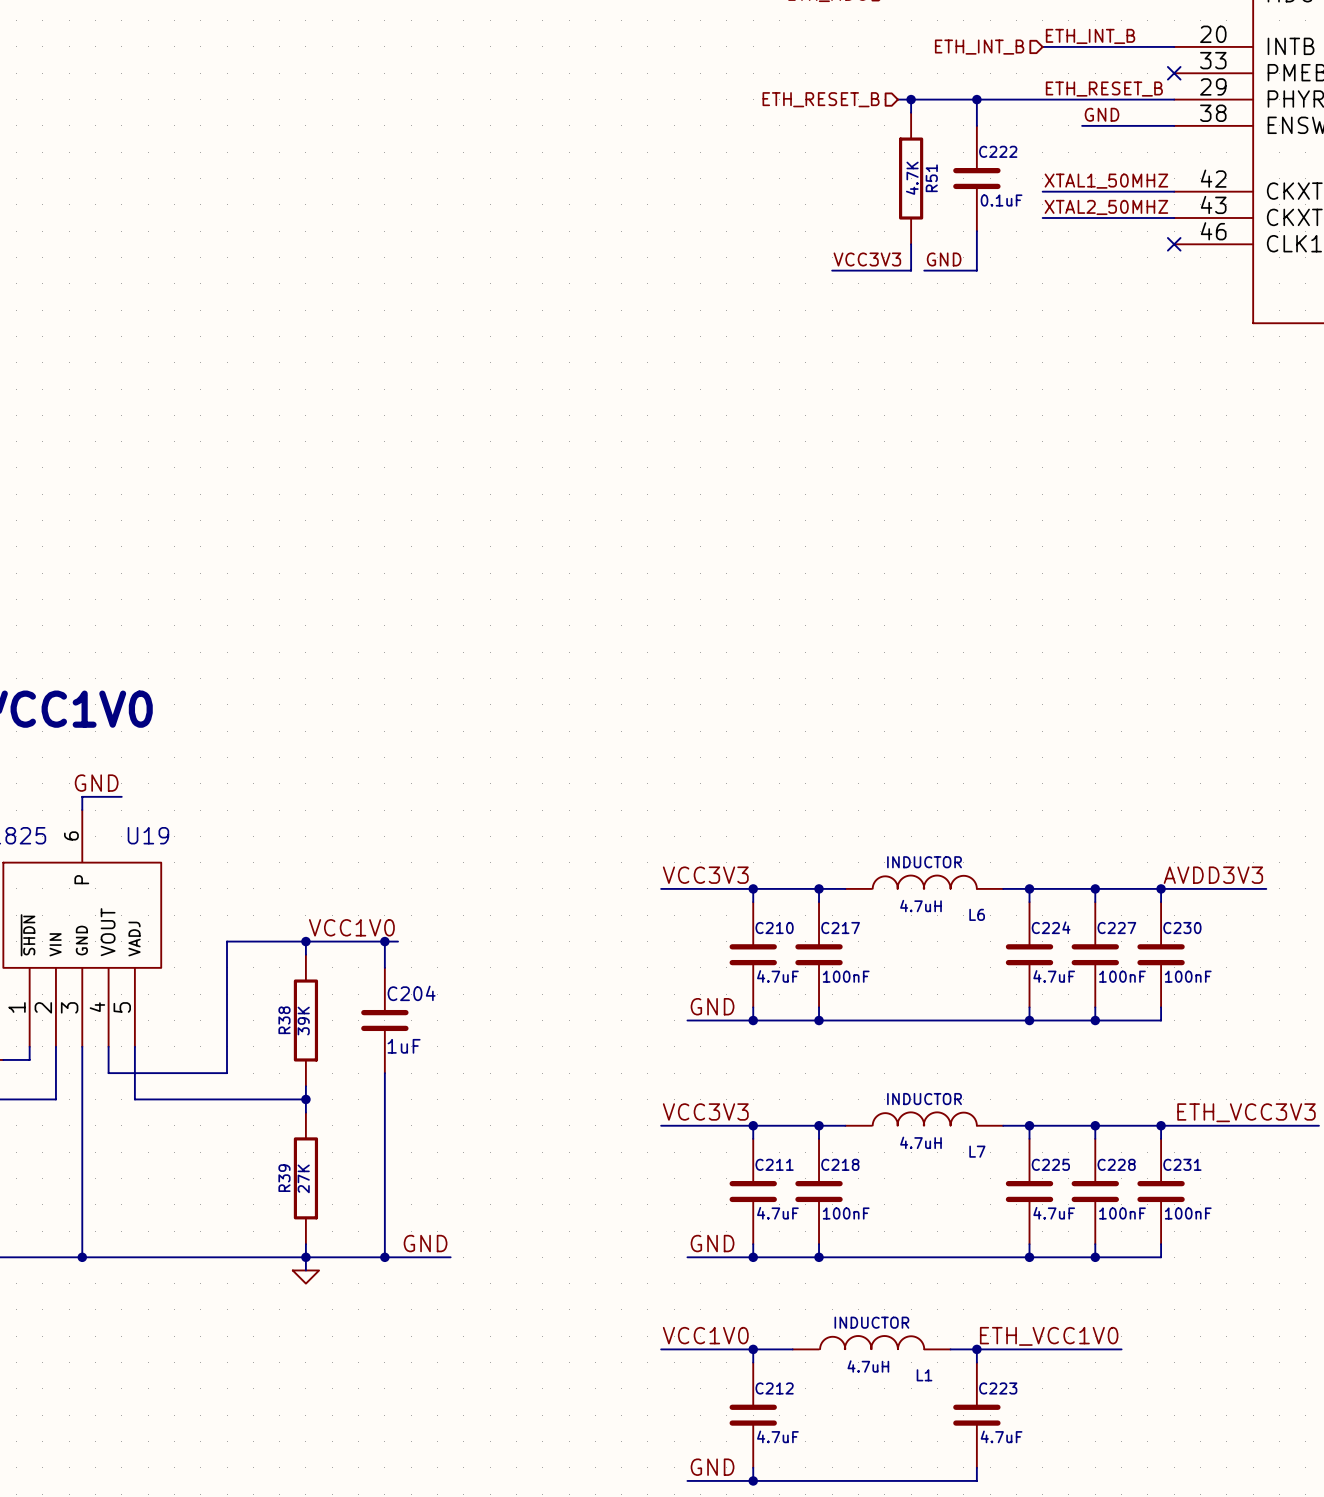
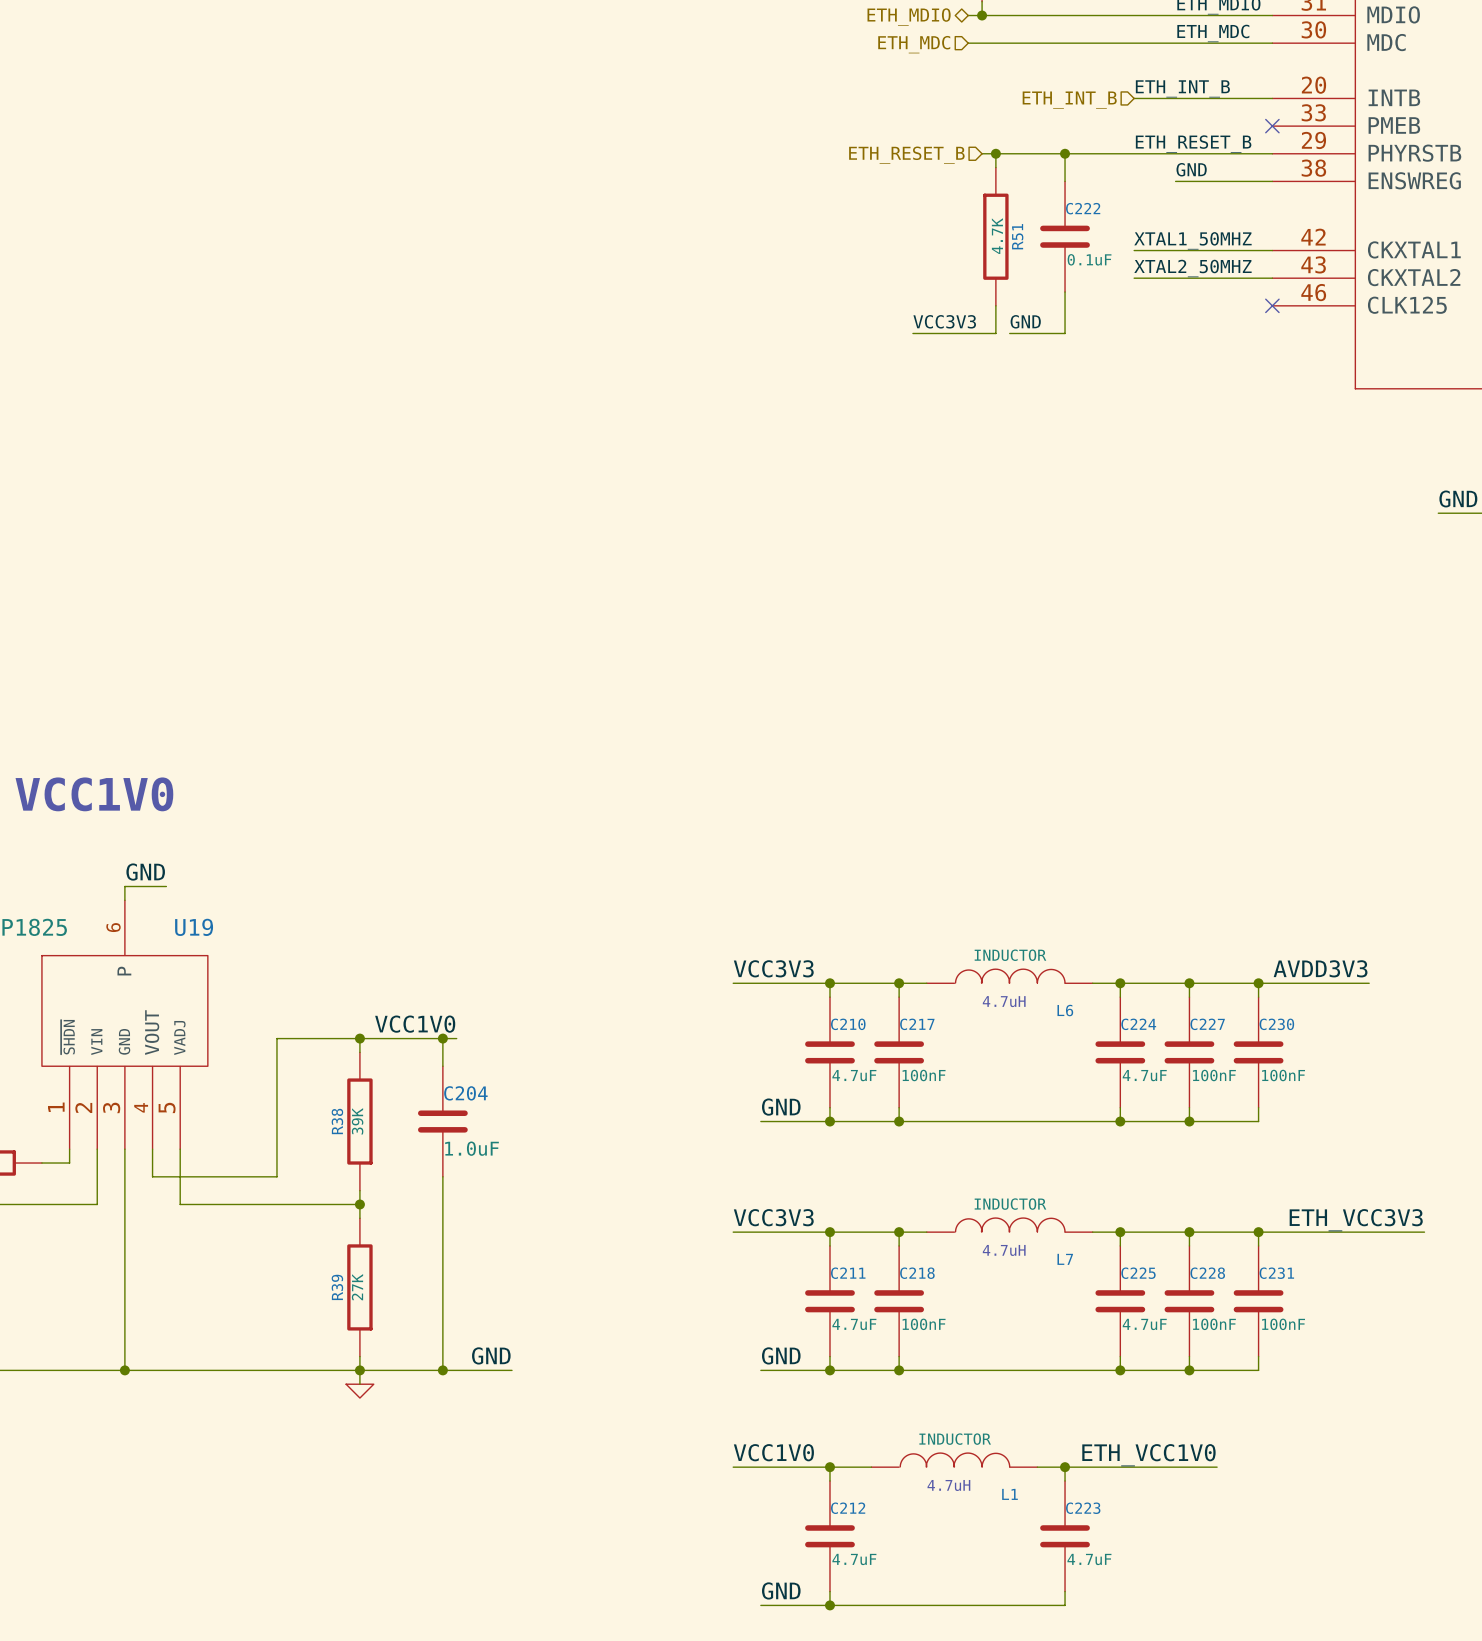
C204 value: 1uF (404, 1046) -> 1.0uF (472, 1148)

